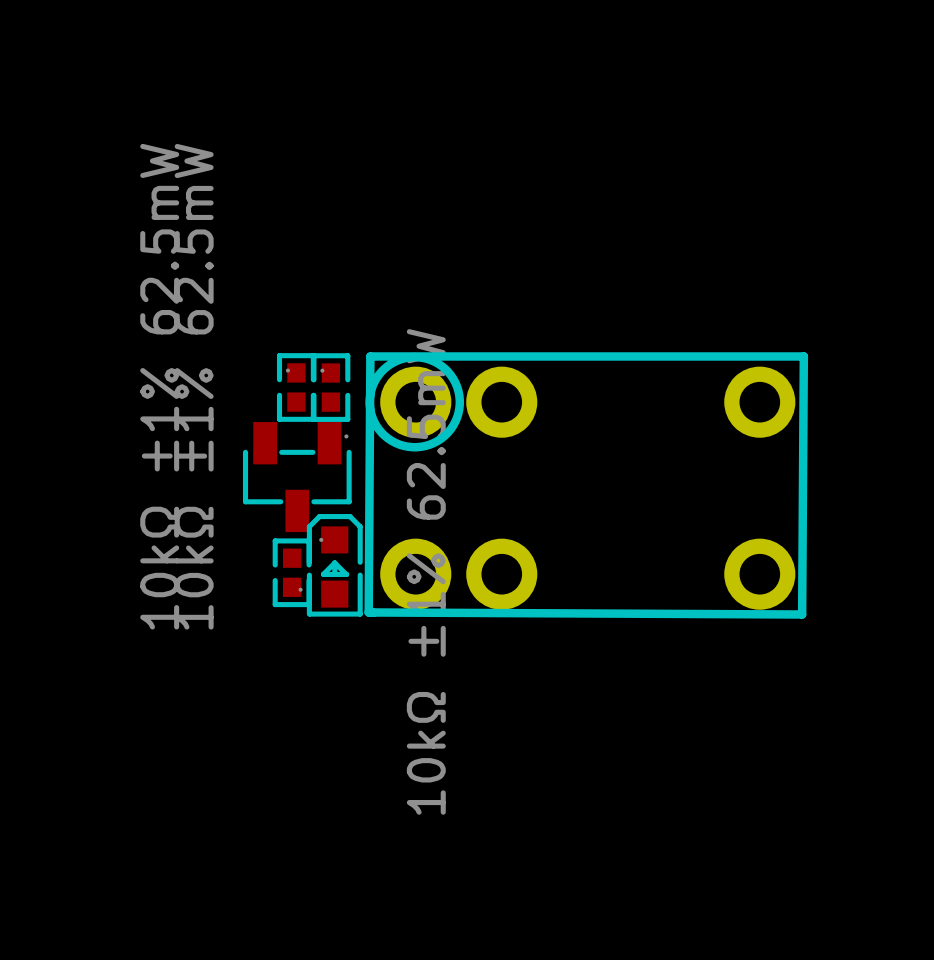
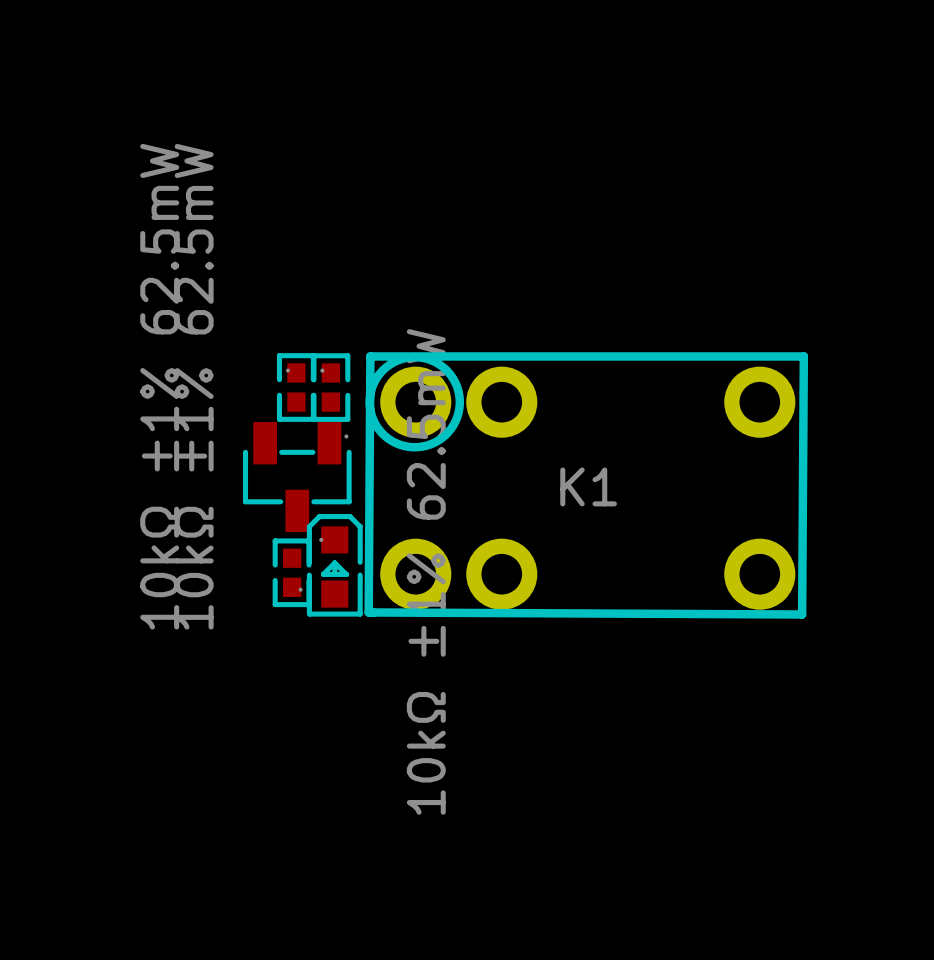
K1 name: none -> K1 (588, 486)

